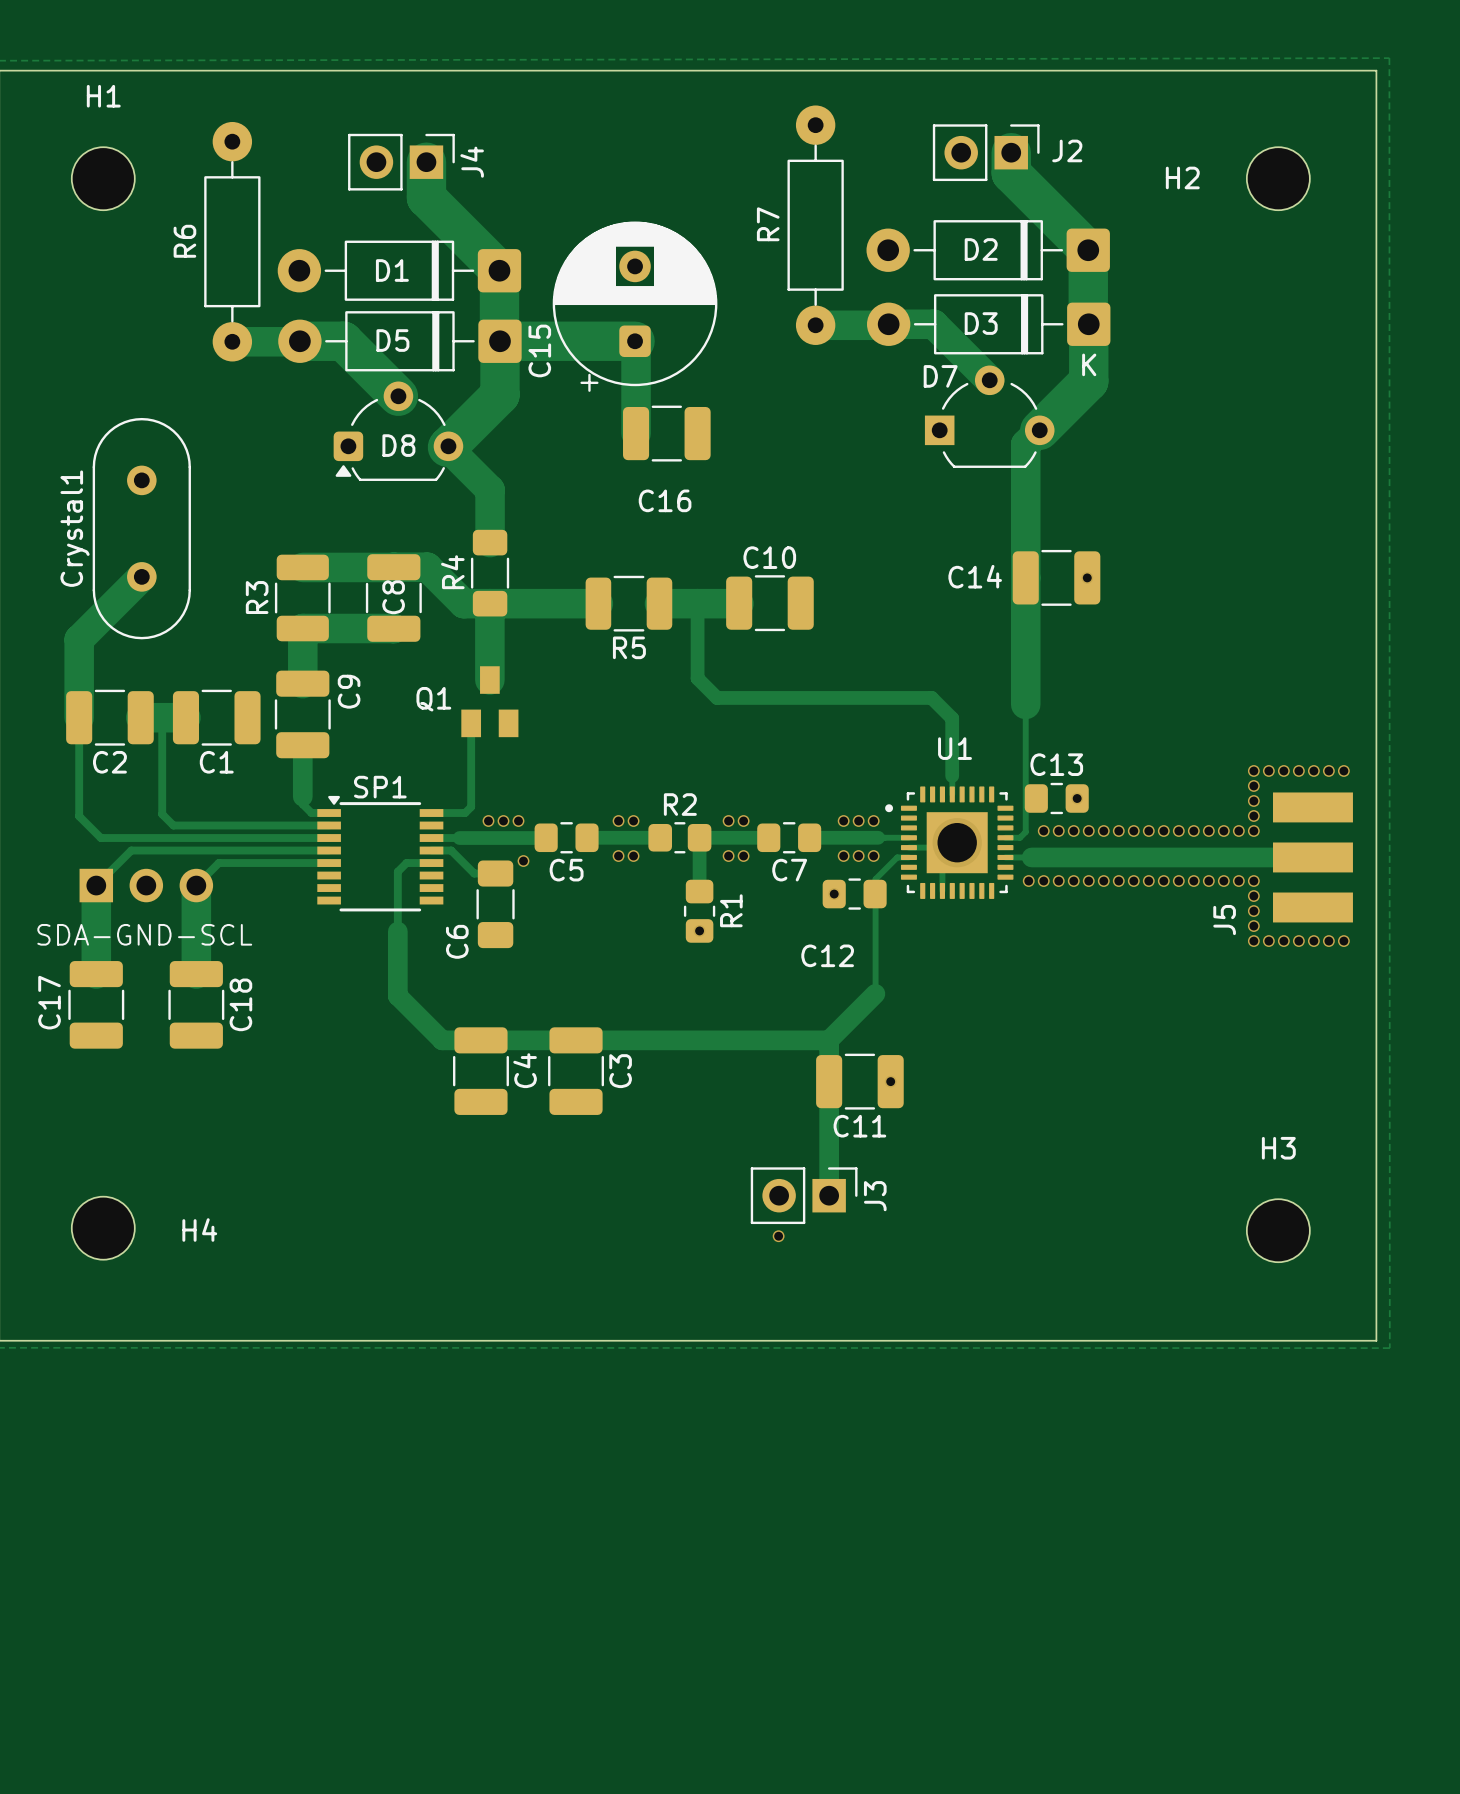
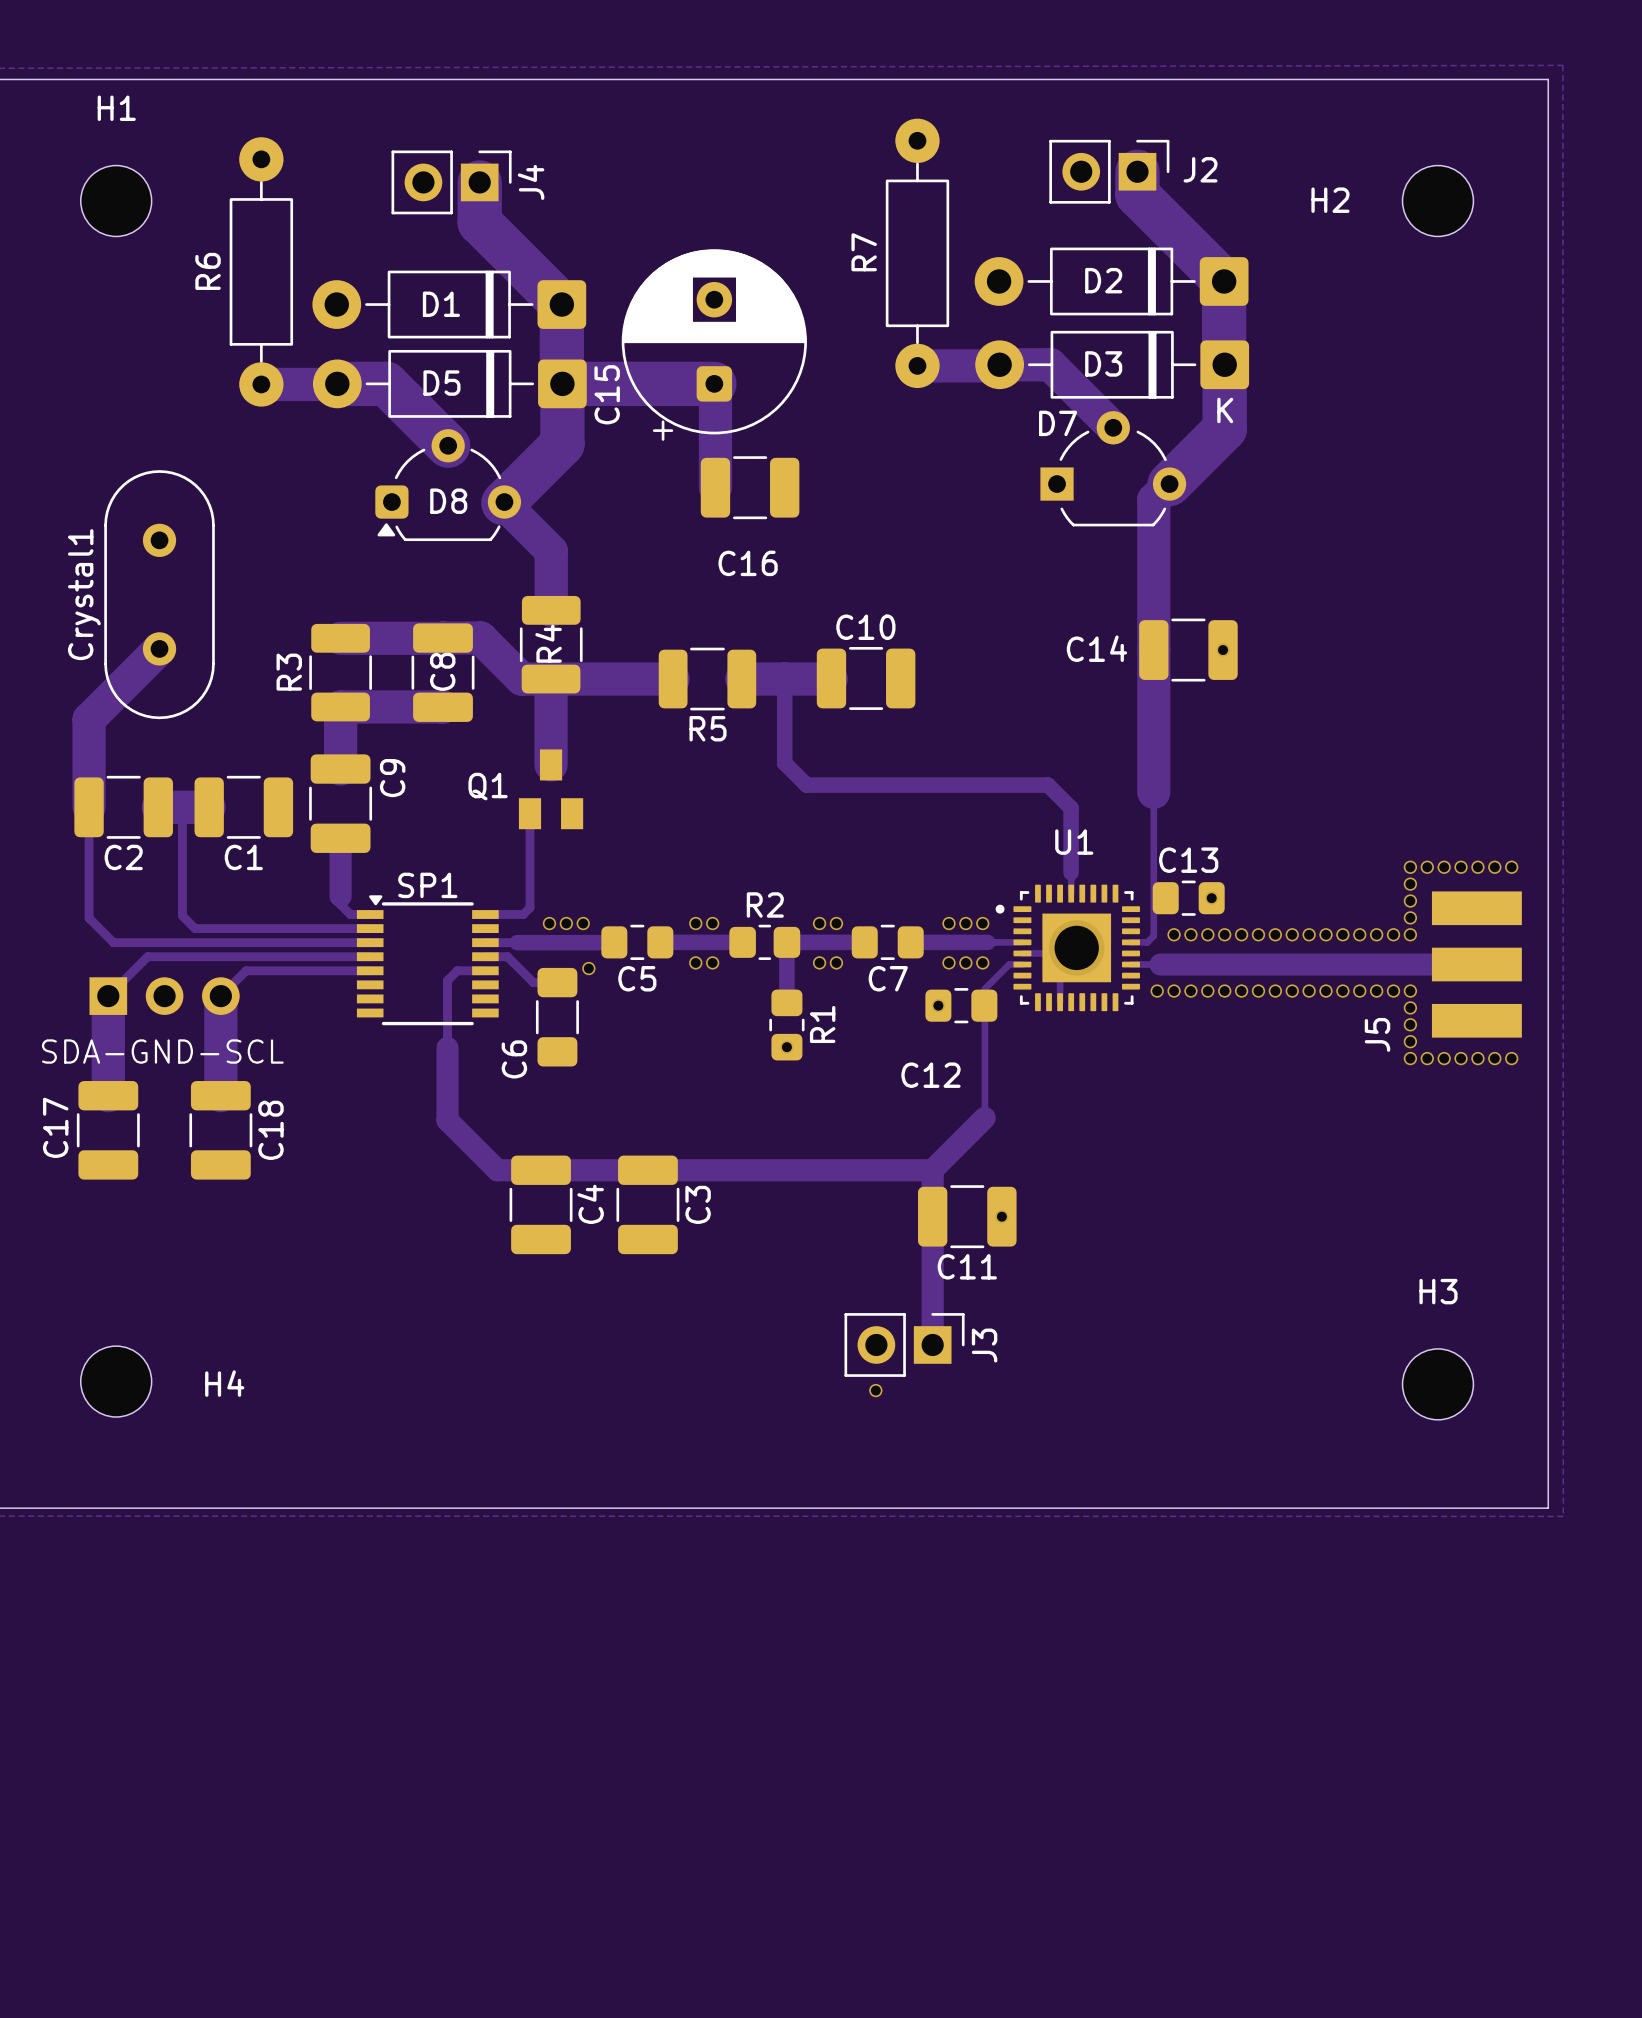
R4 footprint: [470, 529, 510, 617] -> [519, 595, 583, 694]
R4 name position: R4 (452, 572) -> R4 (548, 643)

